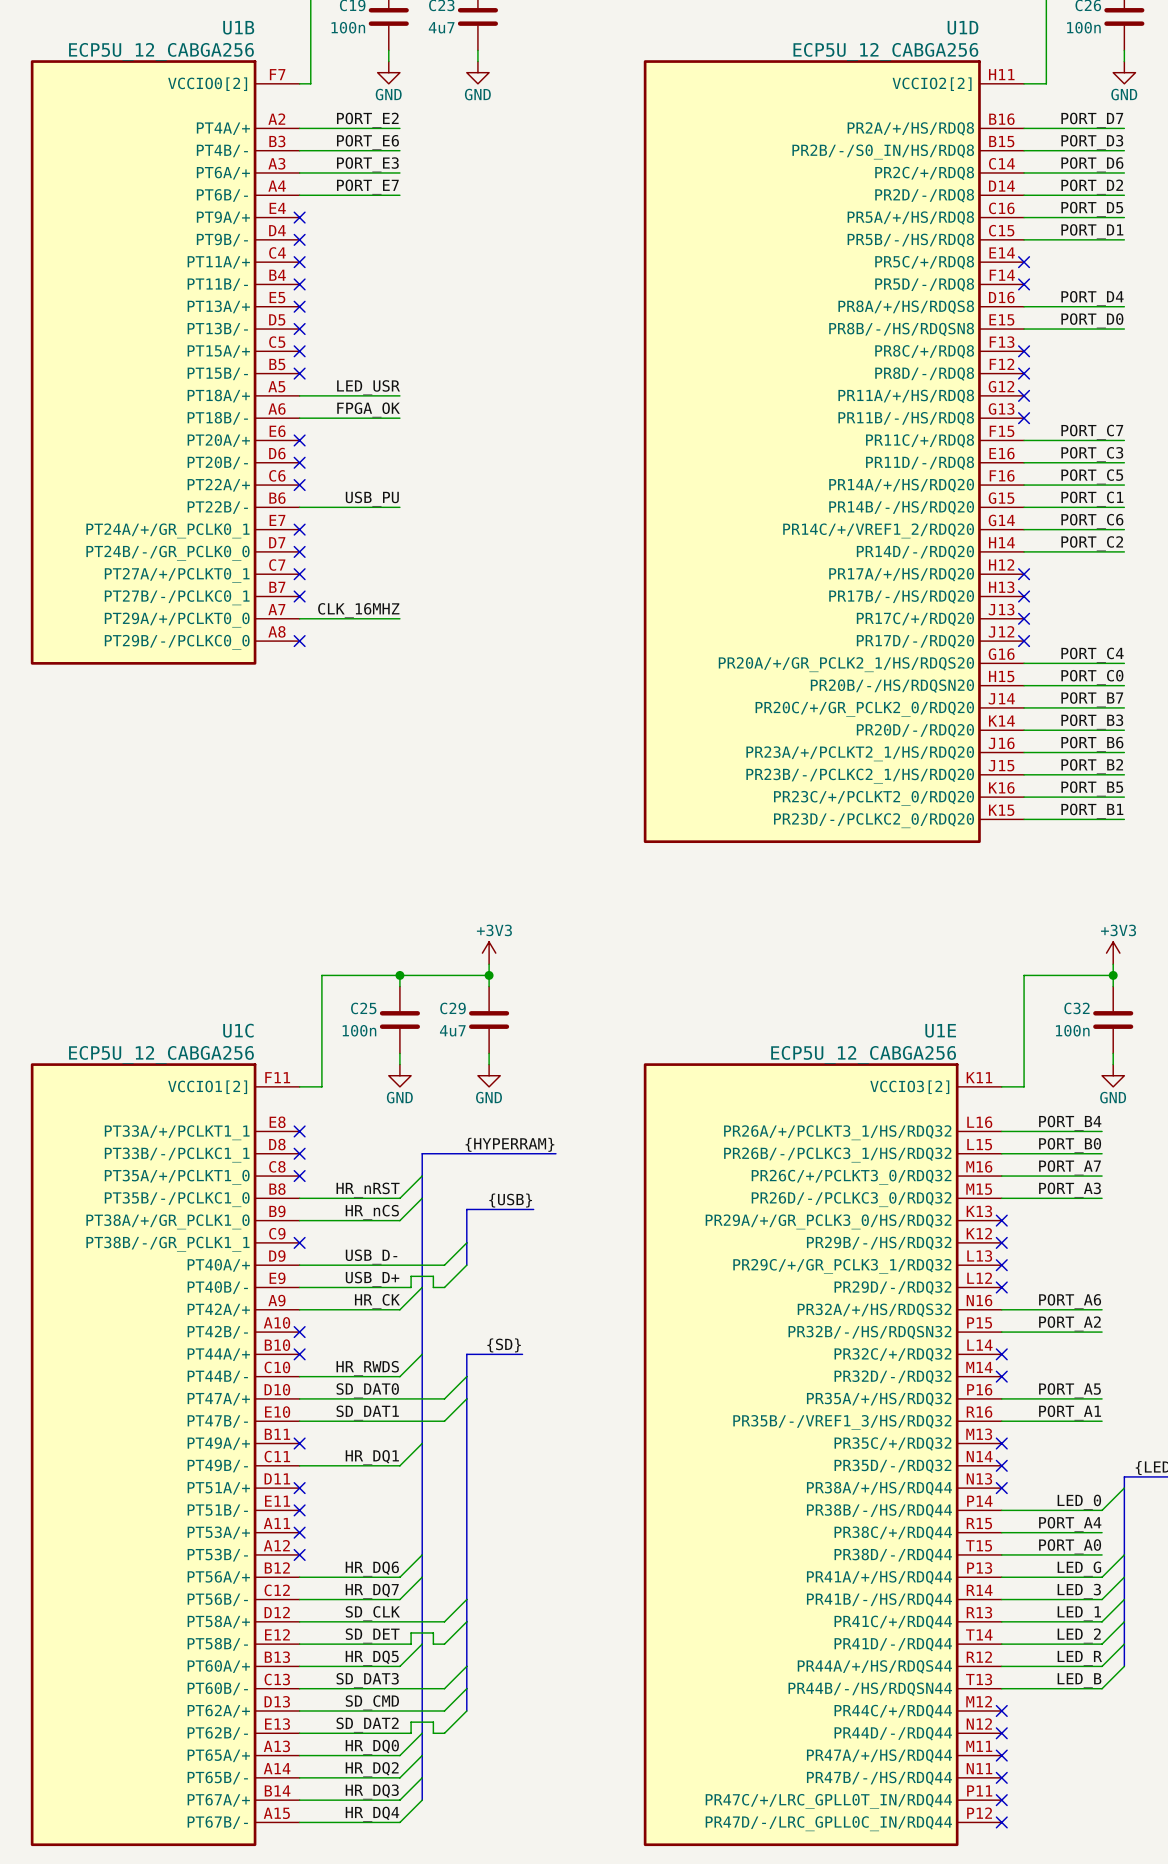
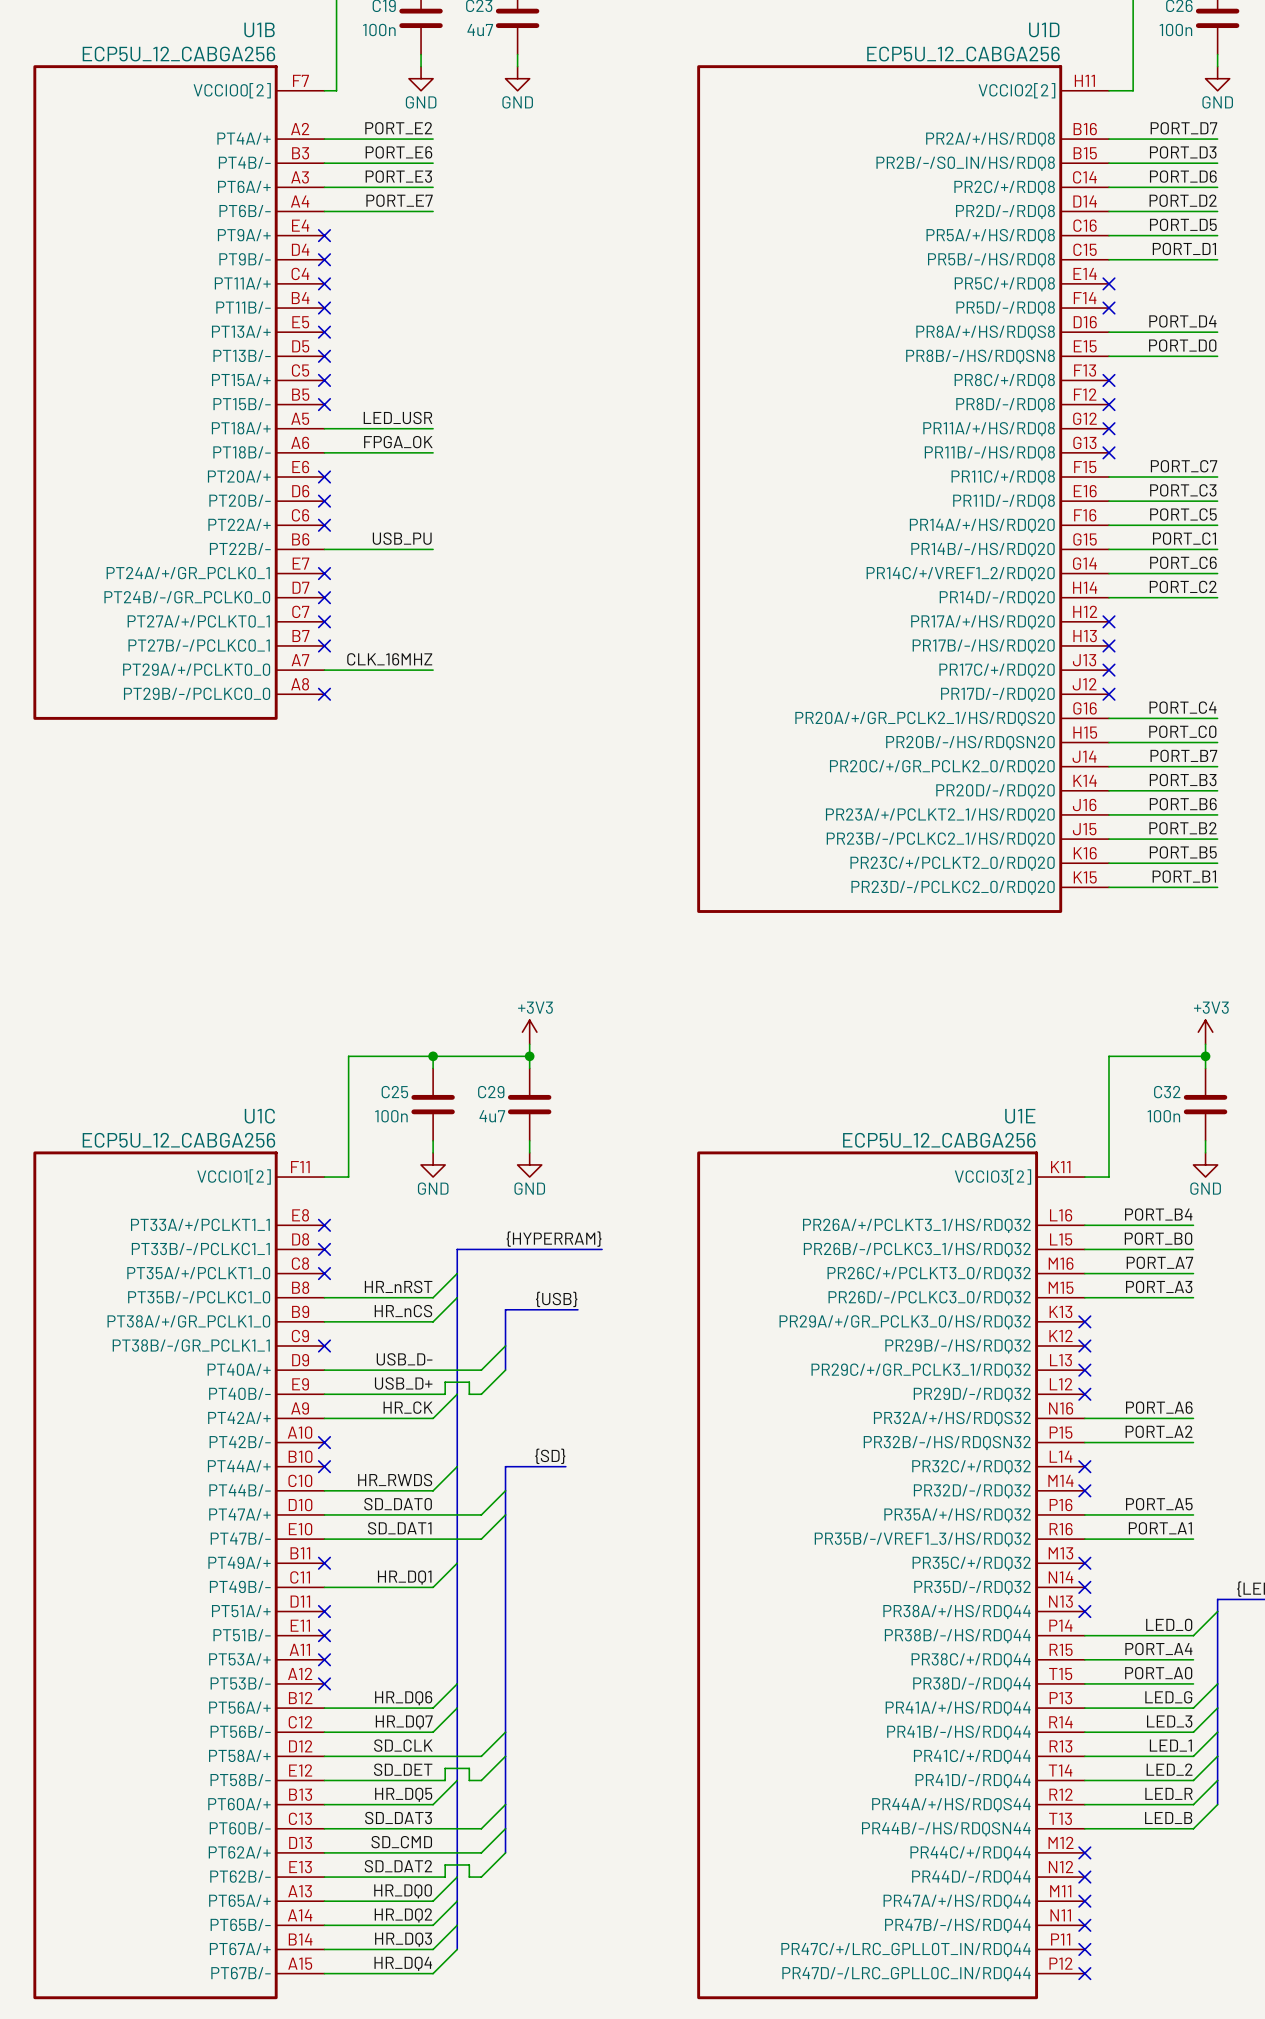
U1B symbol: [30, 60, 300, 665] -> [33, 65, 325, 720]
U1D symbol: [643, 60, 1025, 844] -> [697, 65, 1109, 913]
U1C symbol: [30, 1063, 300, 1847] -> [33, 1151, 325, 2000]
U1E symbol: [643, 1063, 1002, 1847] -> [697, 1151, 1085, 2000]

